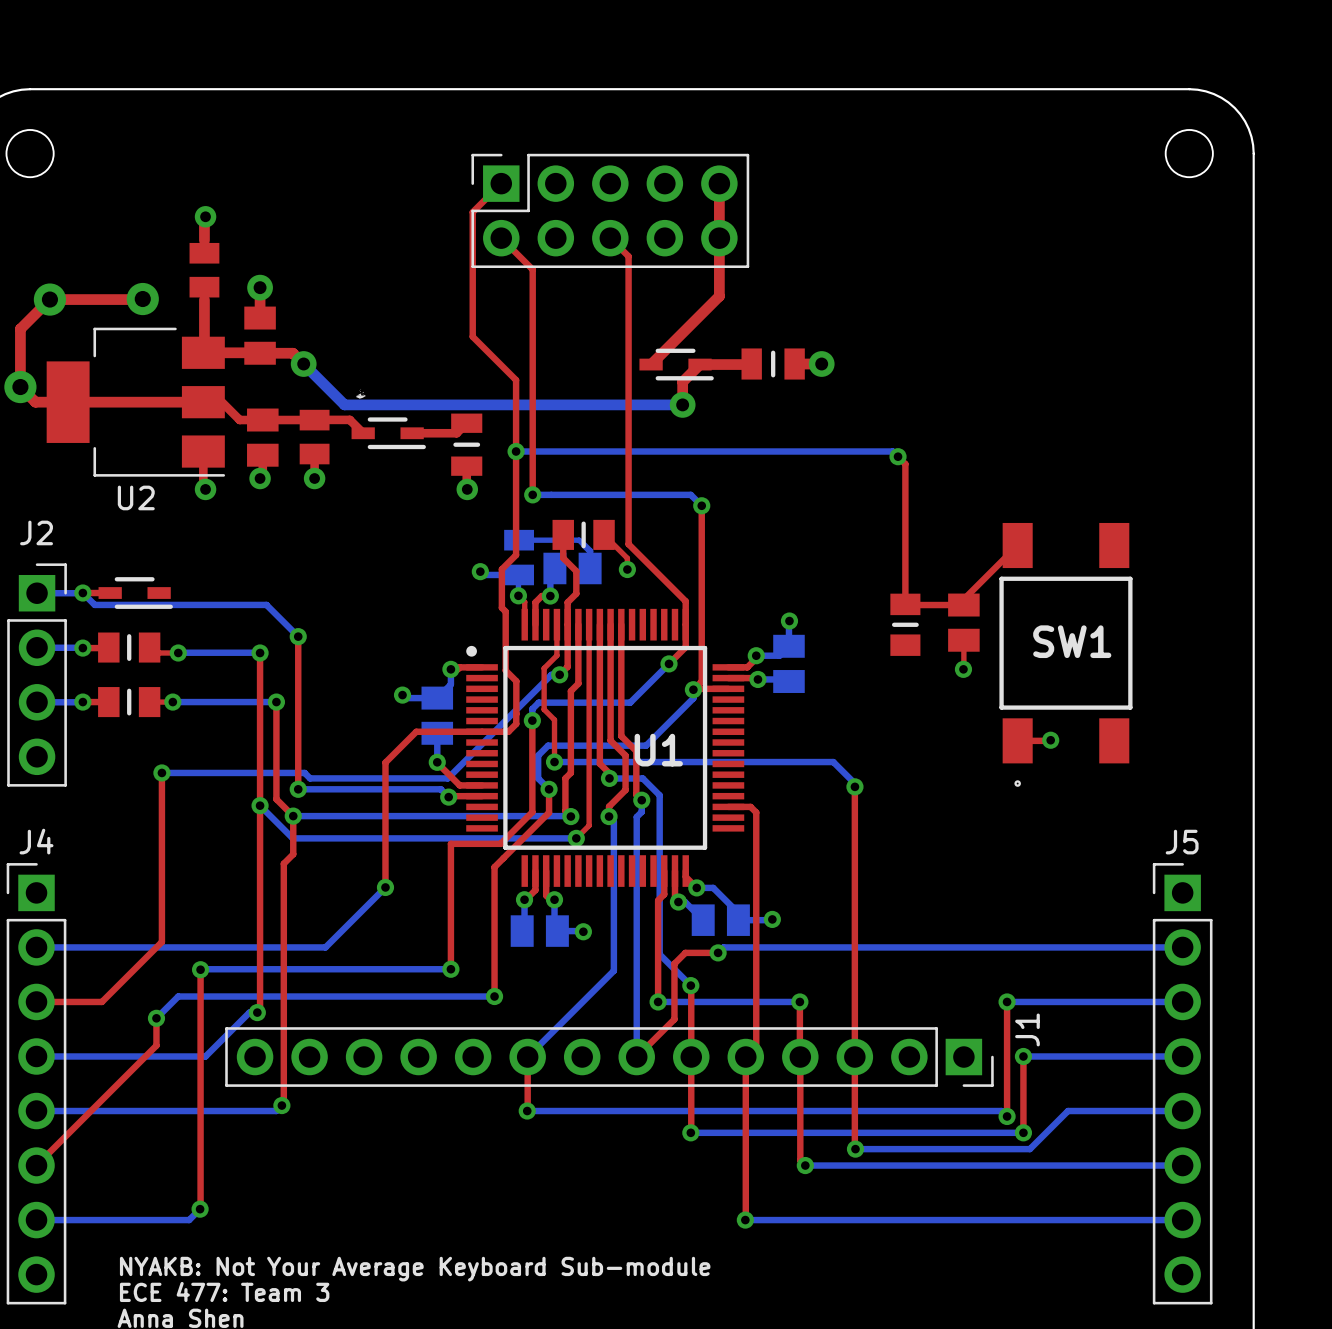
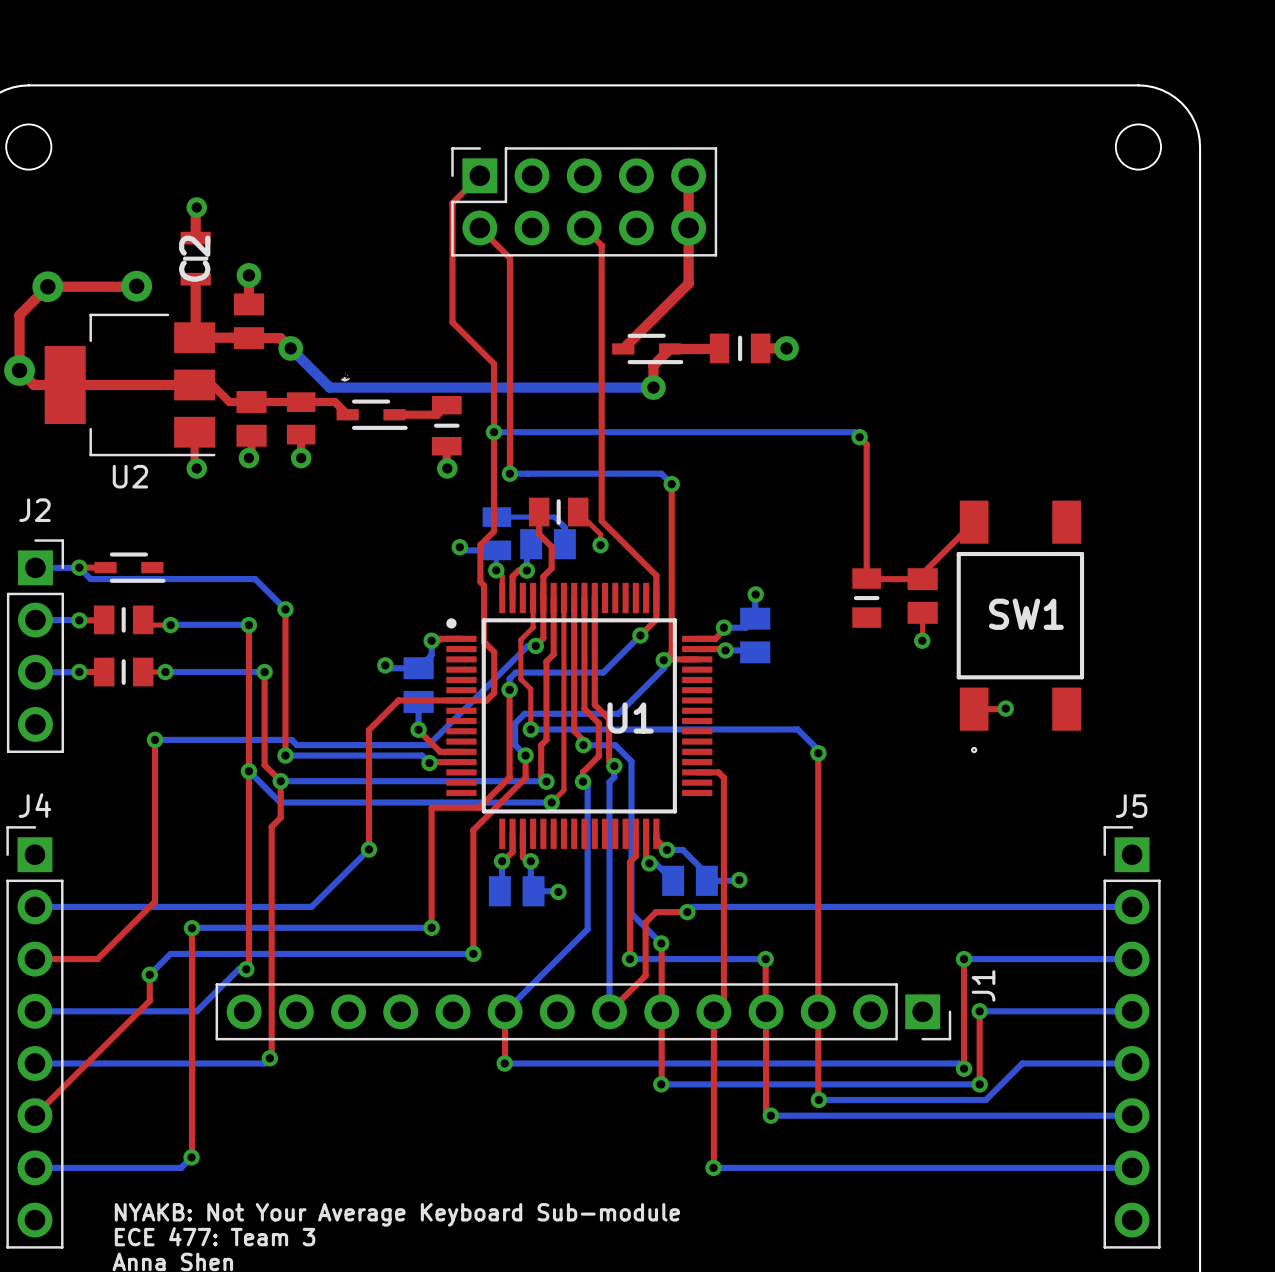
part: (204, 270) -> none
C2: none -> (195, 258)

